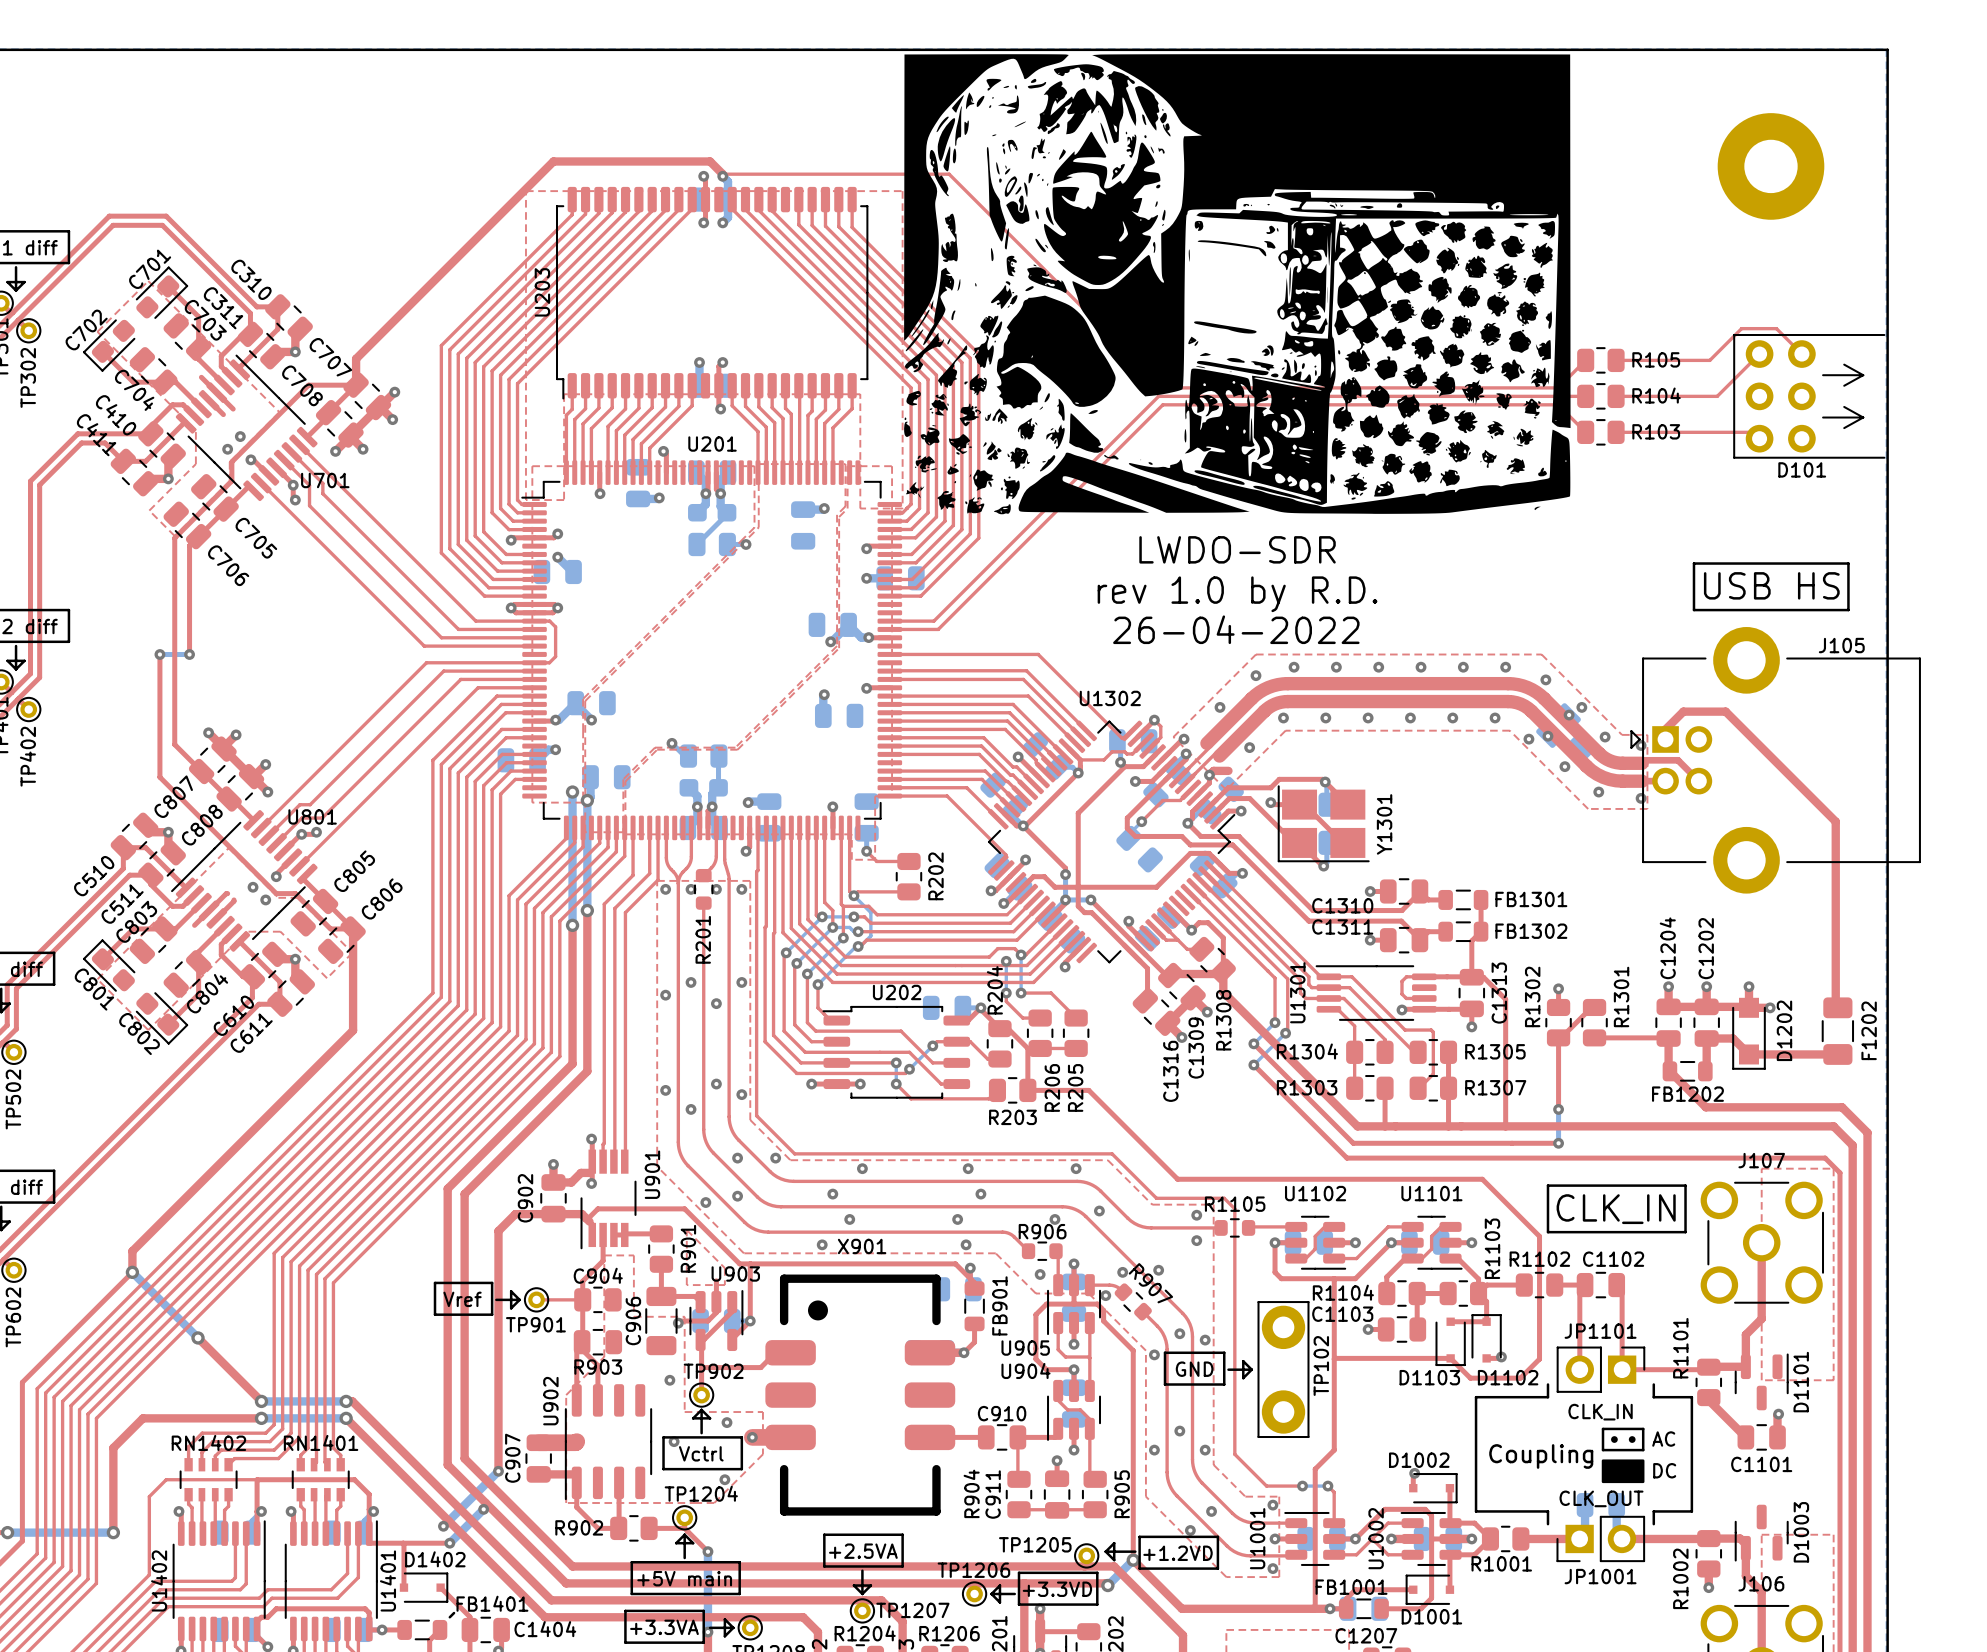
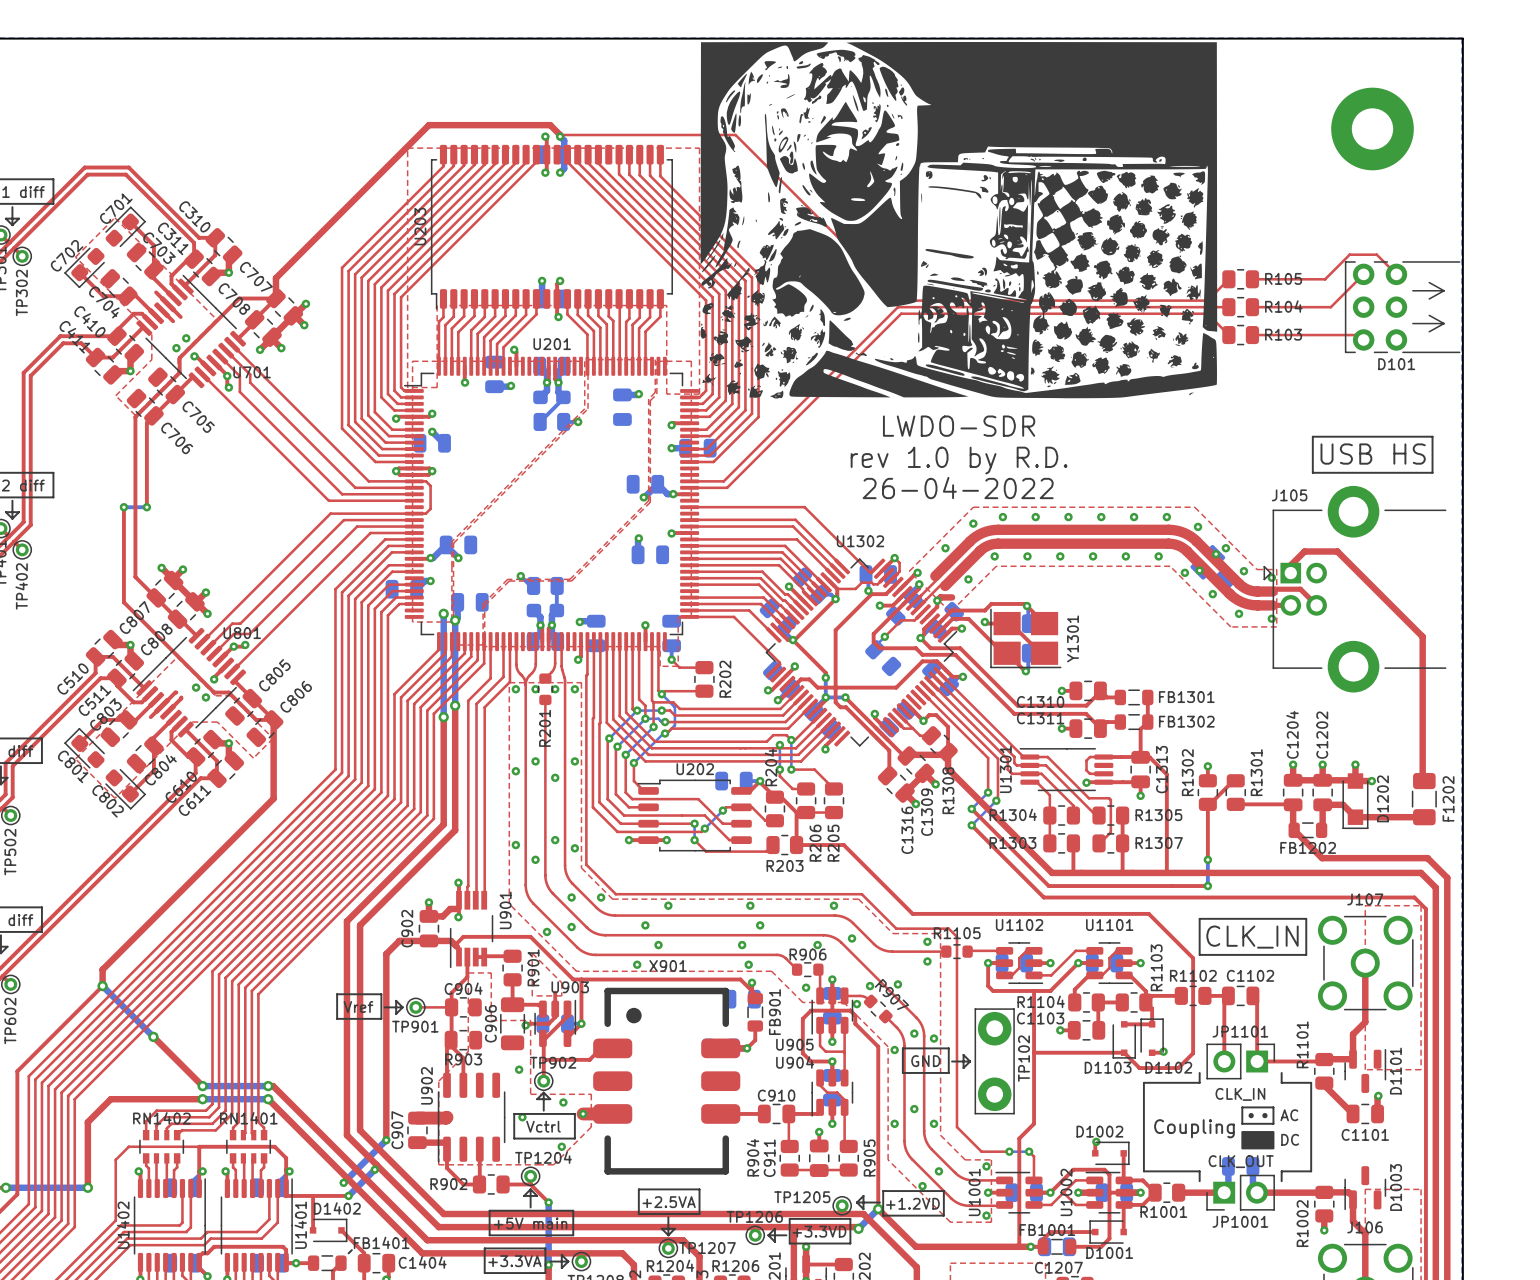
D101 footprint: [1733, 334, 1886, 459] -> [1344, 261, 1461, 354]
J105 footprint: [1630, 627, 1921, 894] -> [1263, 485, 1447, 693]
J105 name position: J105 (1841, 645) -> J105 (1289, 495)

